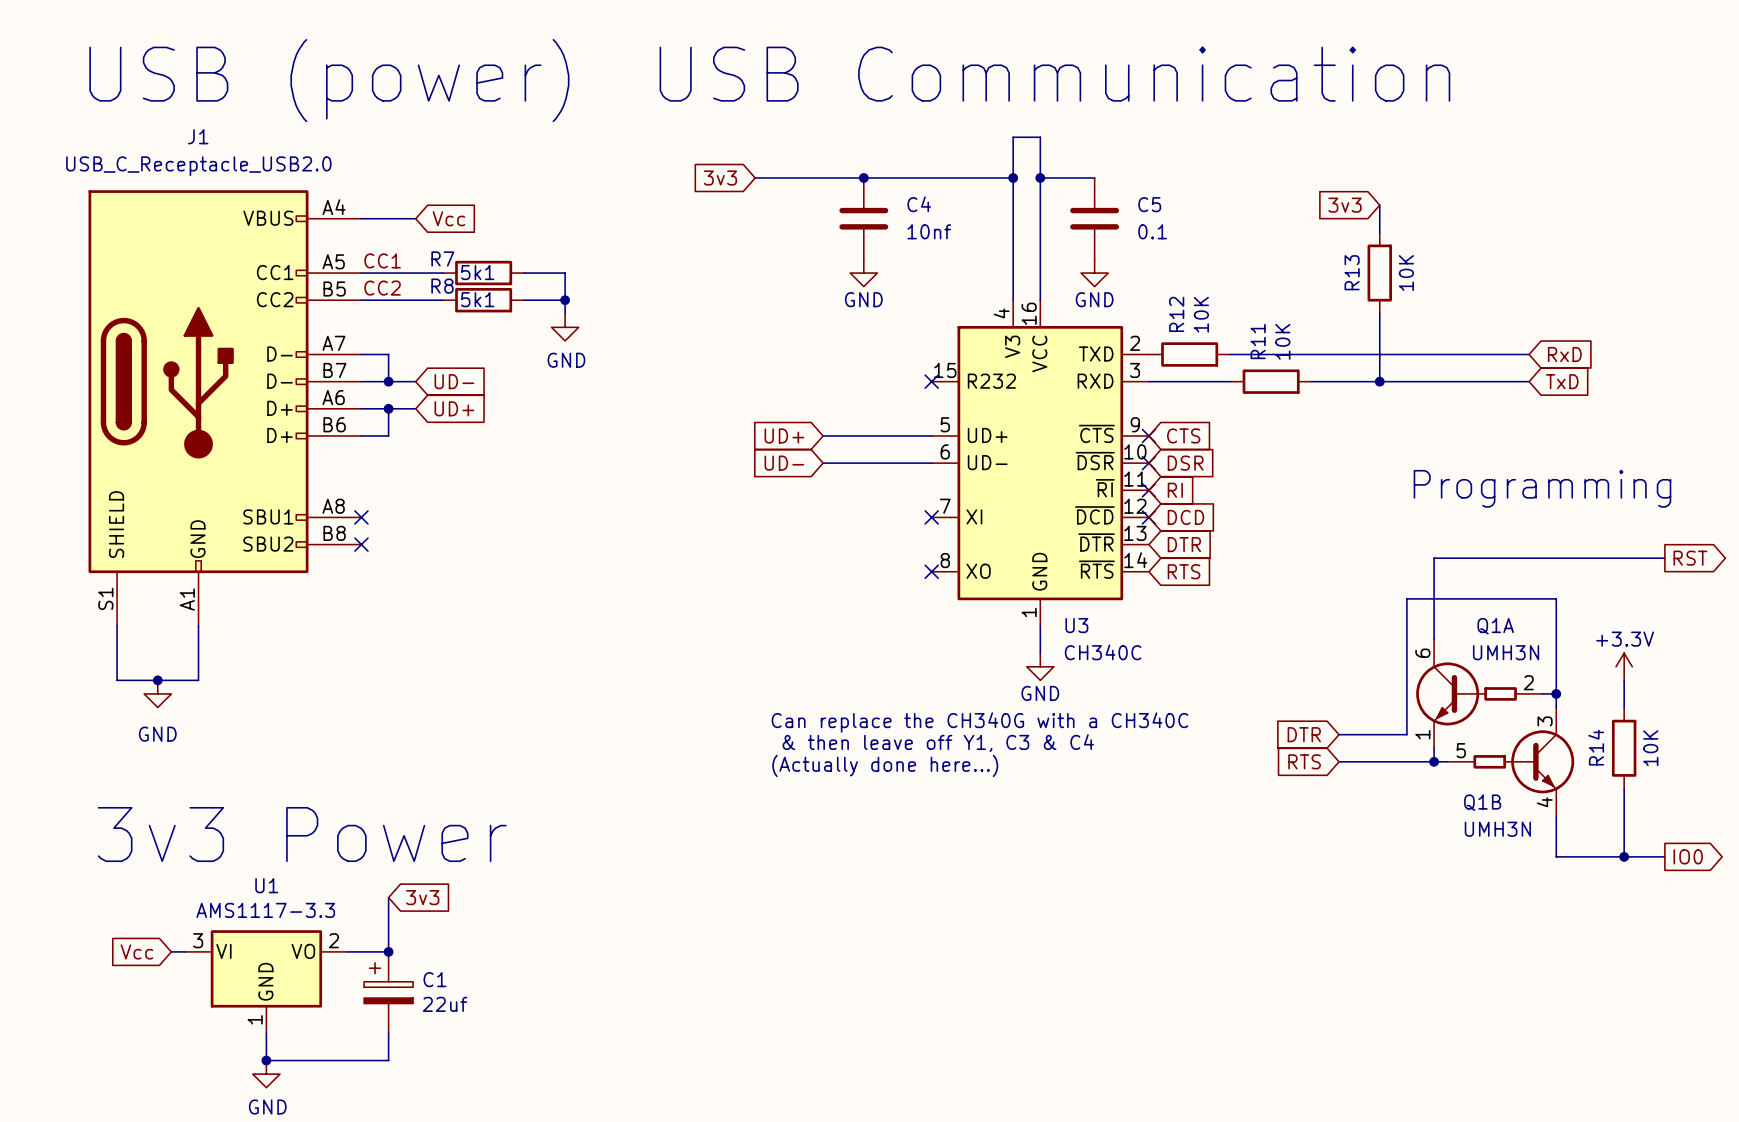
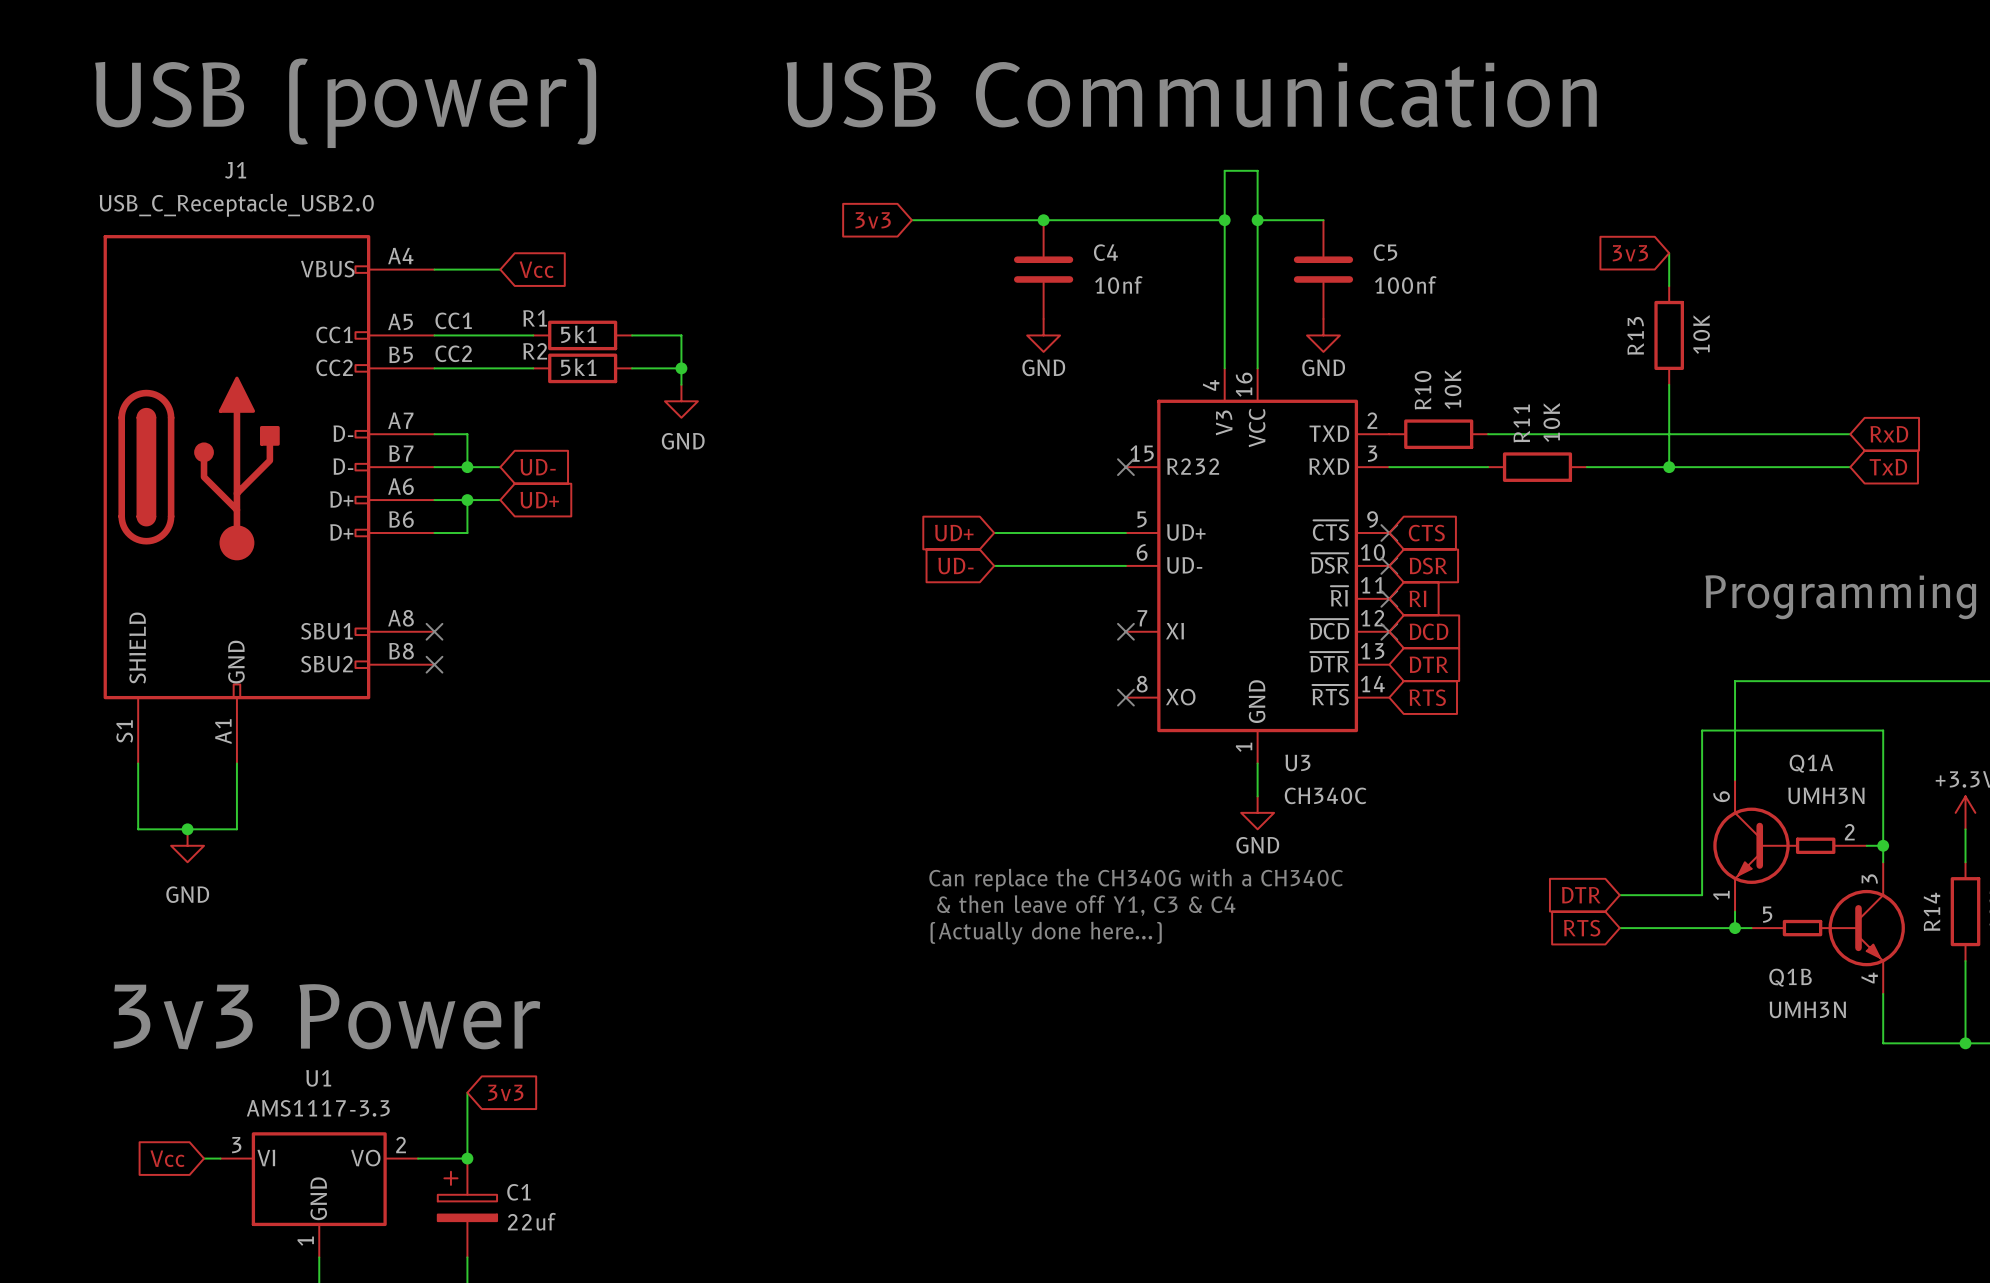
C5 value: 0.1 (1152, 231) -> 100nf (1405, 285)
R7 name: R7 (442, 258) -> R1 (535, 318)
R8 name: R8 (442, 286) -> R2 (535, 351)
R12 name: R12 (1176, 314) -> R10 (1423, 390)

